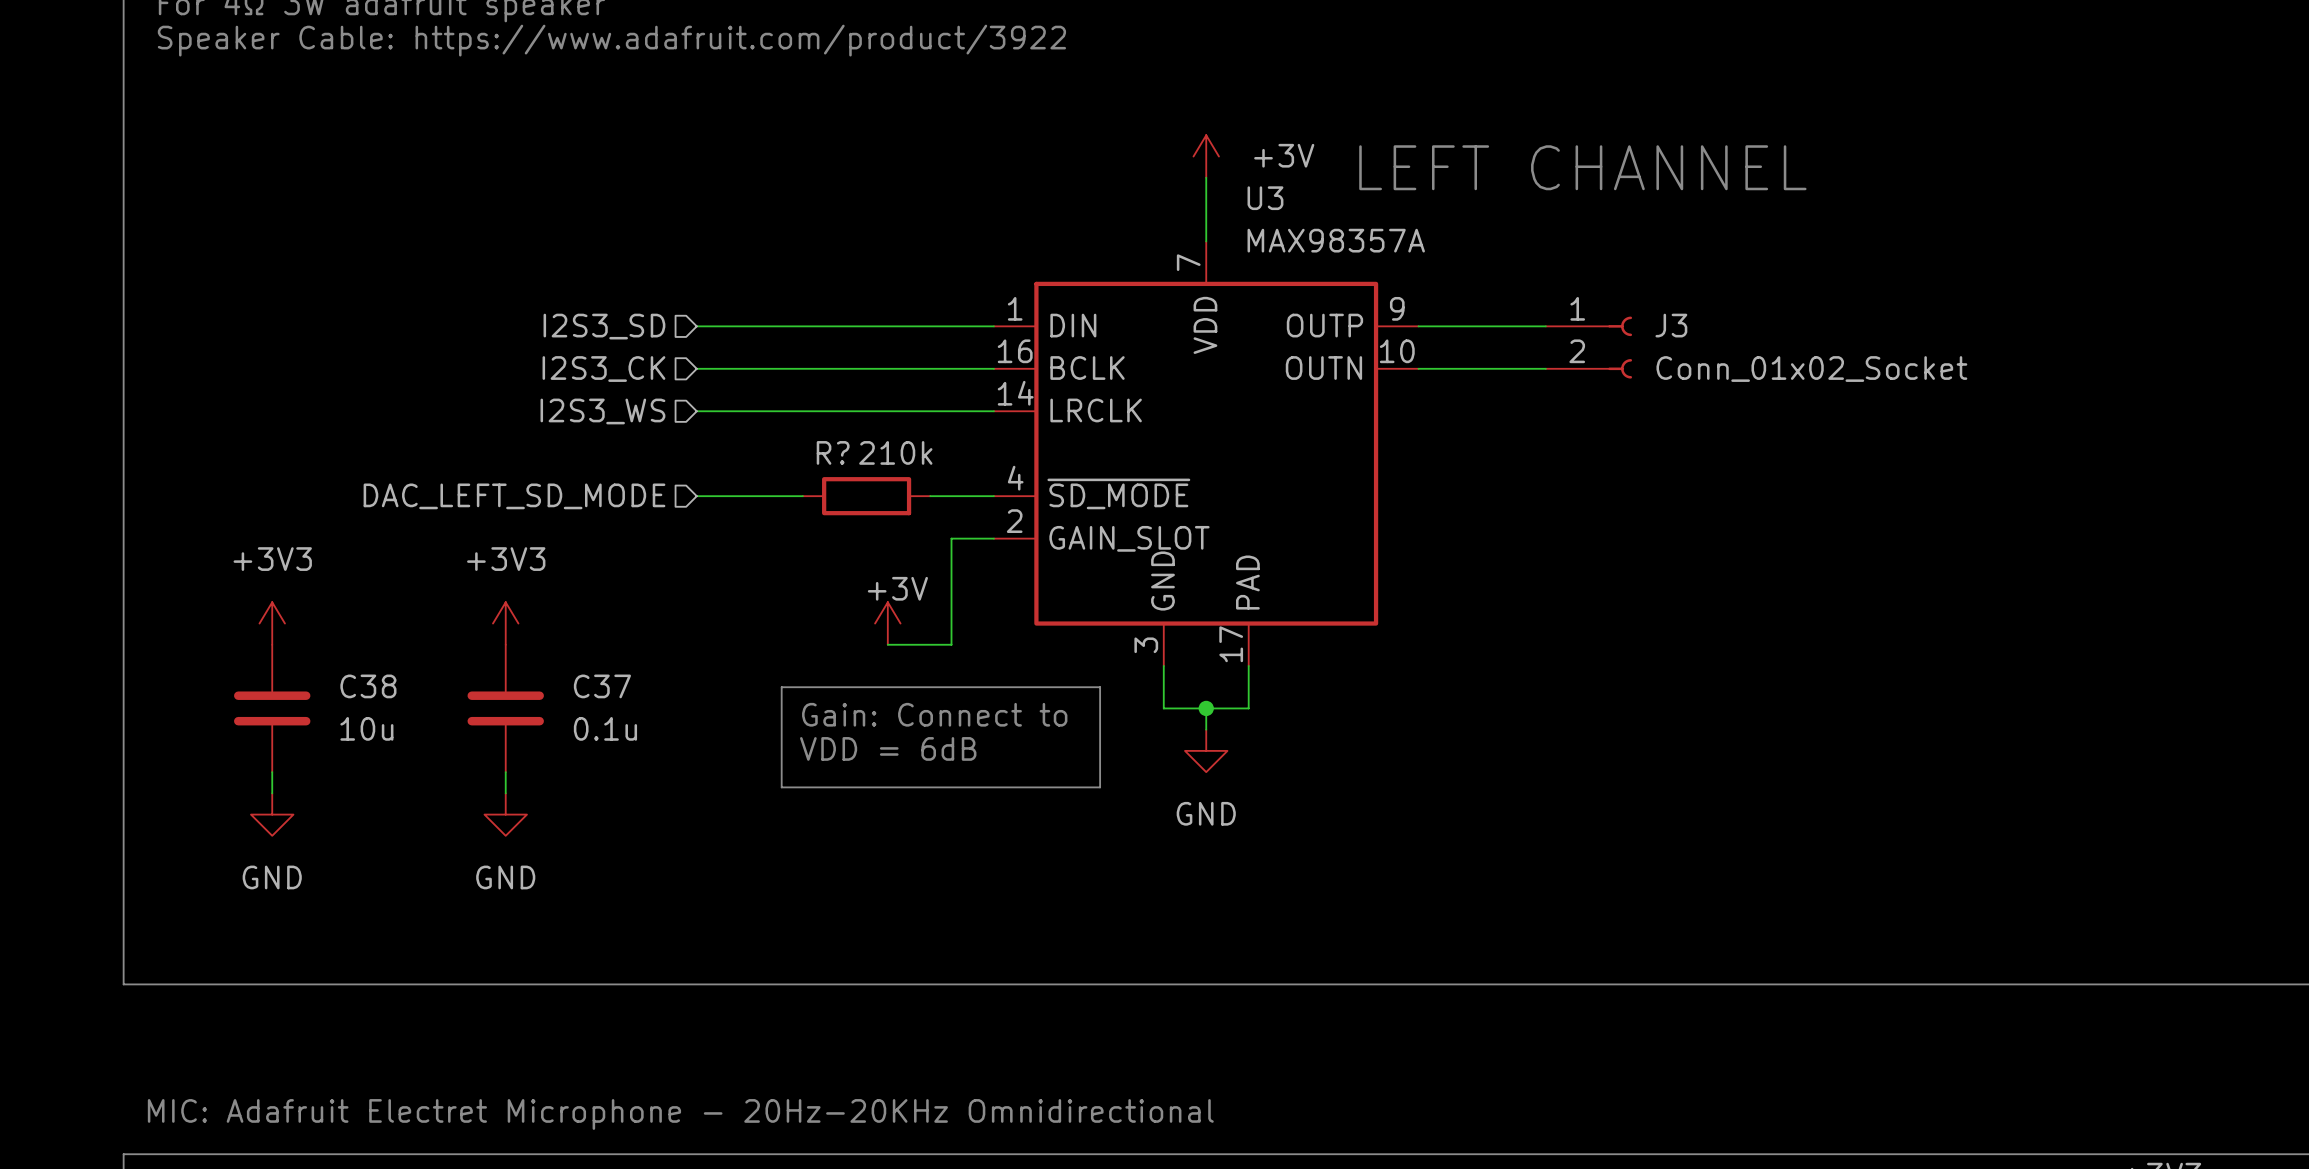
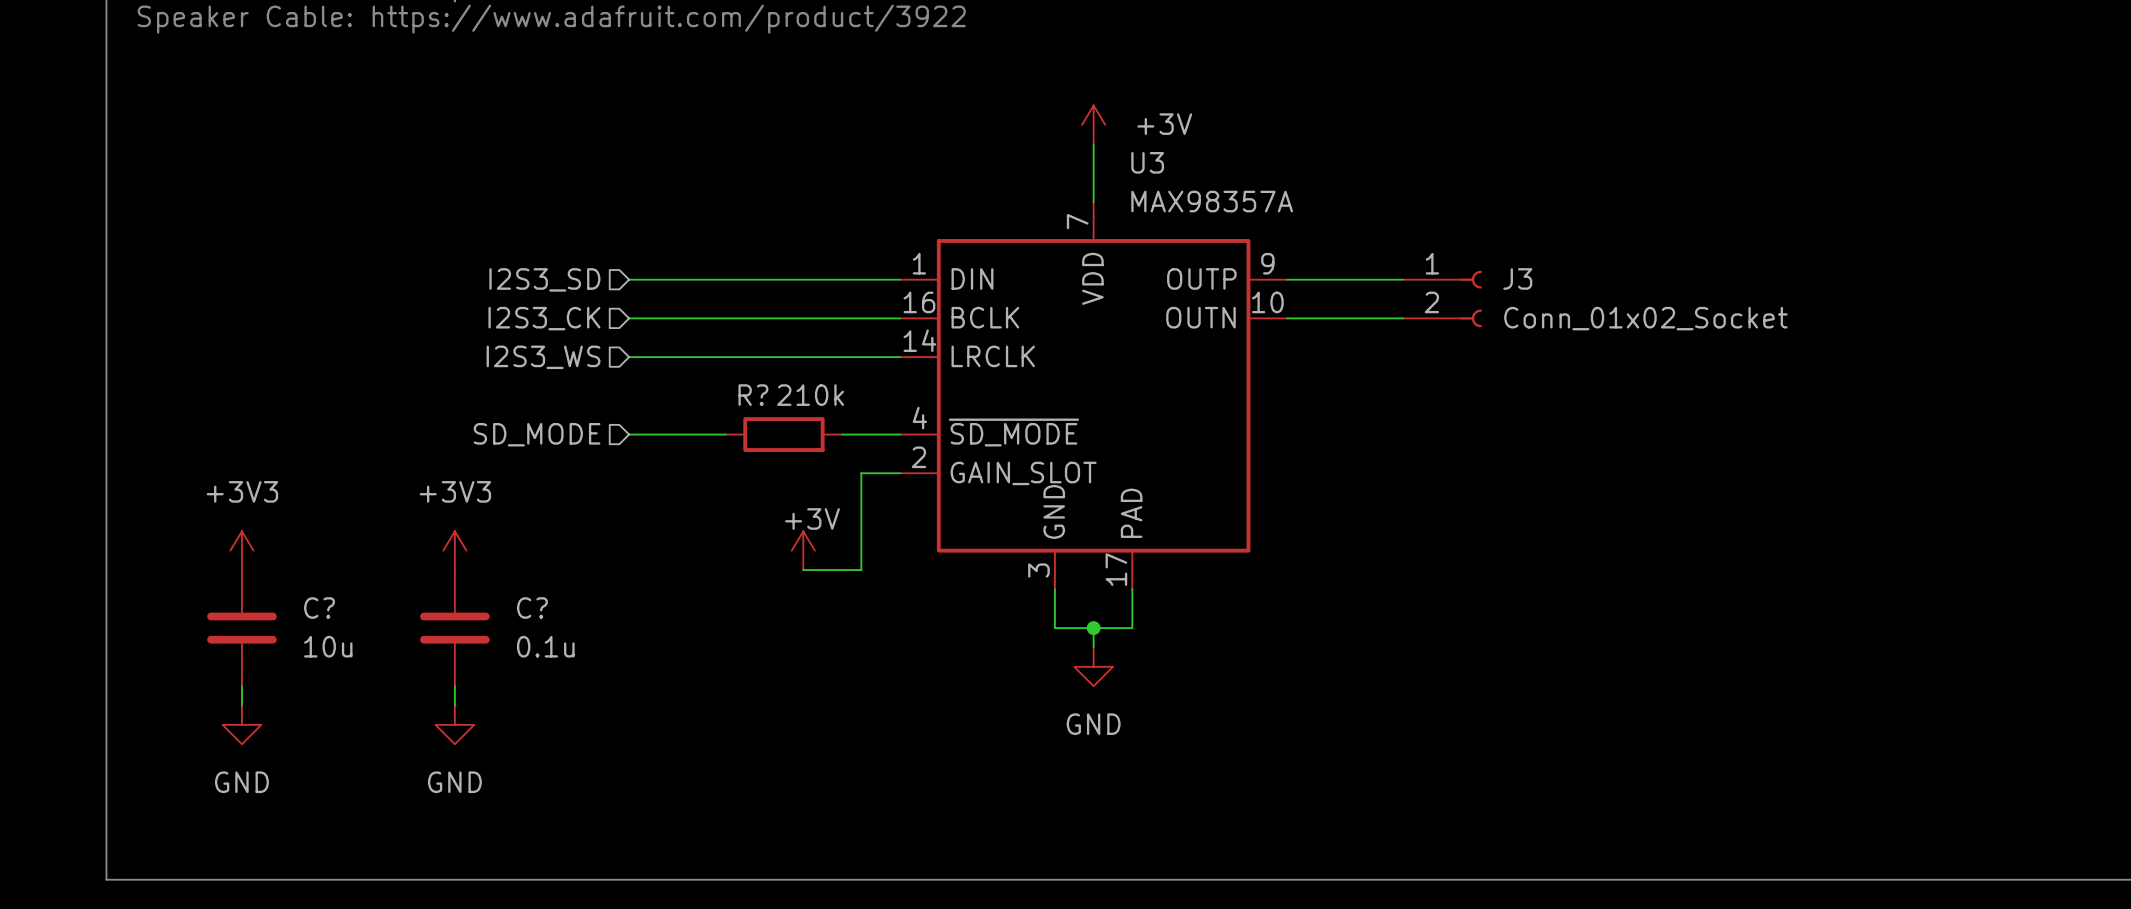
text: LEFT CHANNEL (1582, 167) -> none
hierarchical label: DAC_LEFT_SD_MODE (514, 496) -> SD_MODE (537, 434)
C38 name: C38 (368, 686) -> C? (319, 608)
C37 name: C37 (602, 686) -> C? (532, 608)
line: (781, 687) (1100, 687) (1100, 787) (781, 787) (781, 687) -> none
text: Gain: Connect to (934, 714) -> none
text: VDD = 6dB (888, 748) -> none

